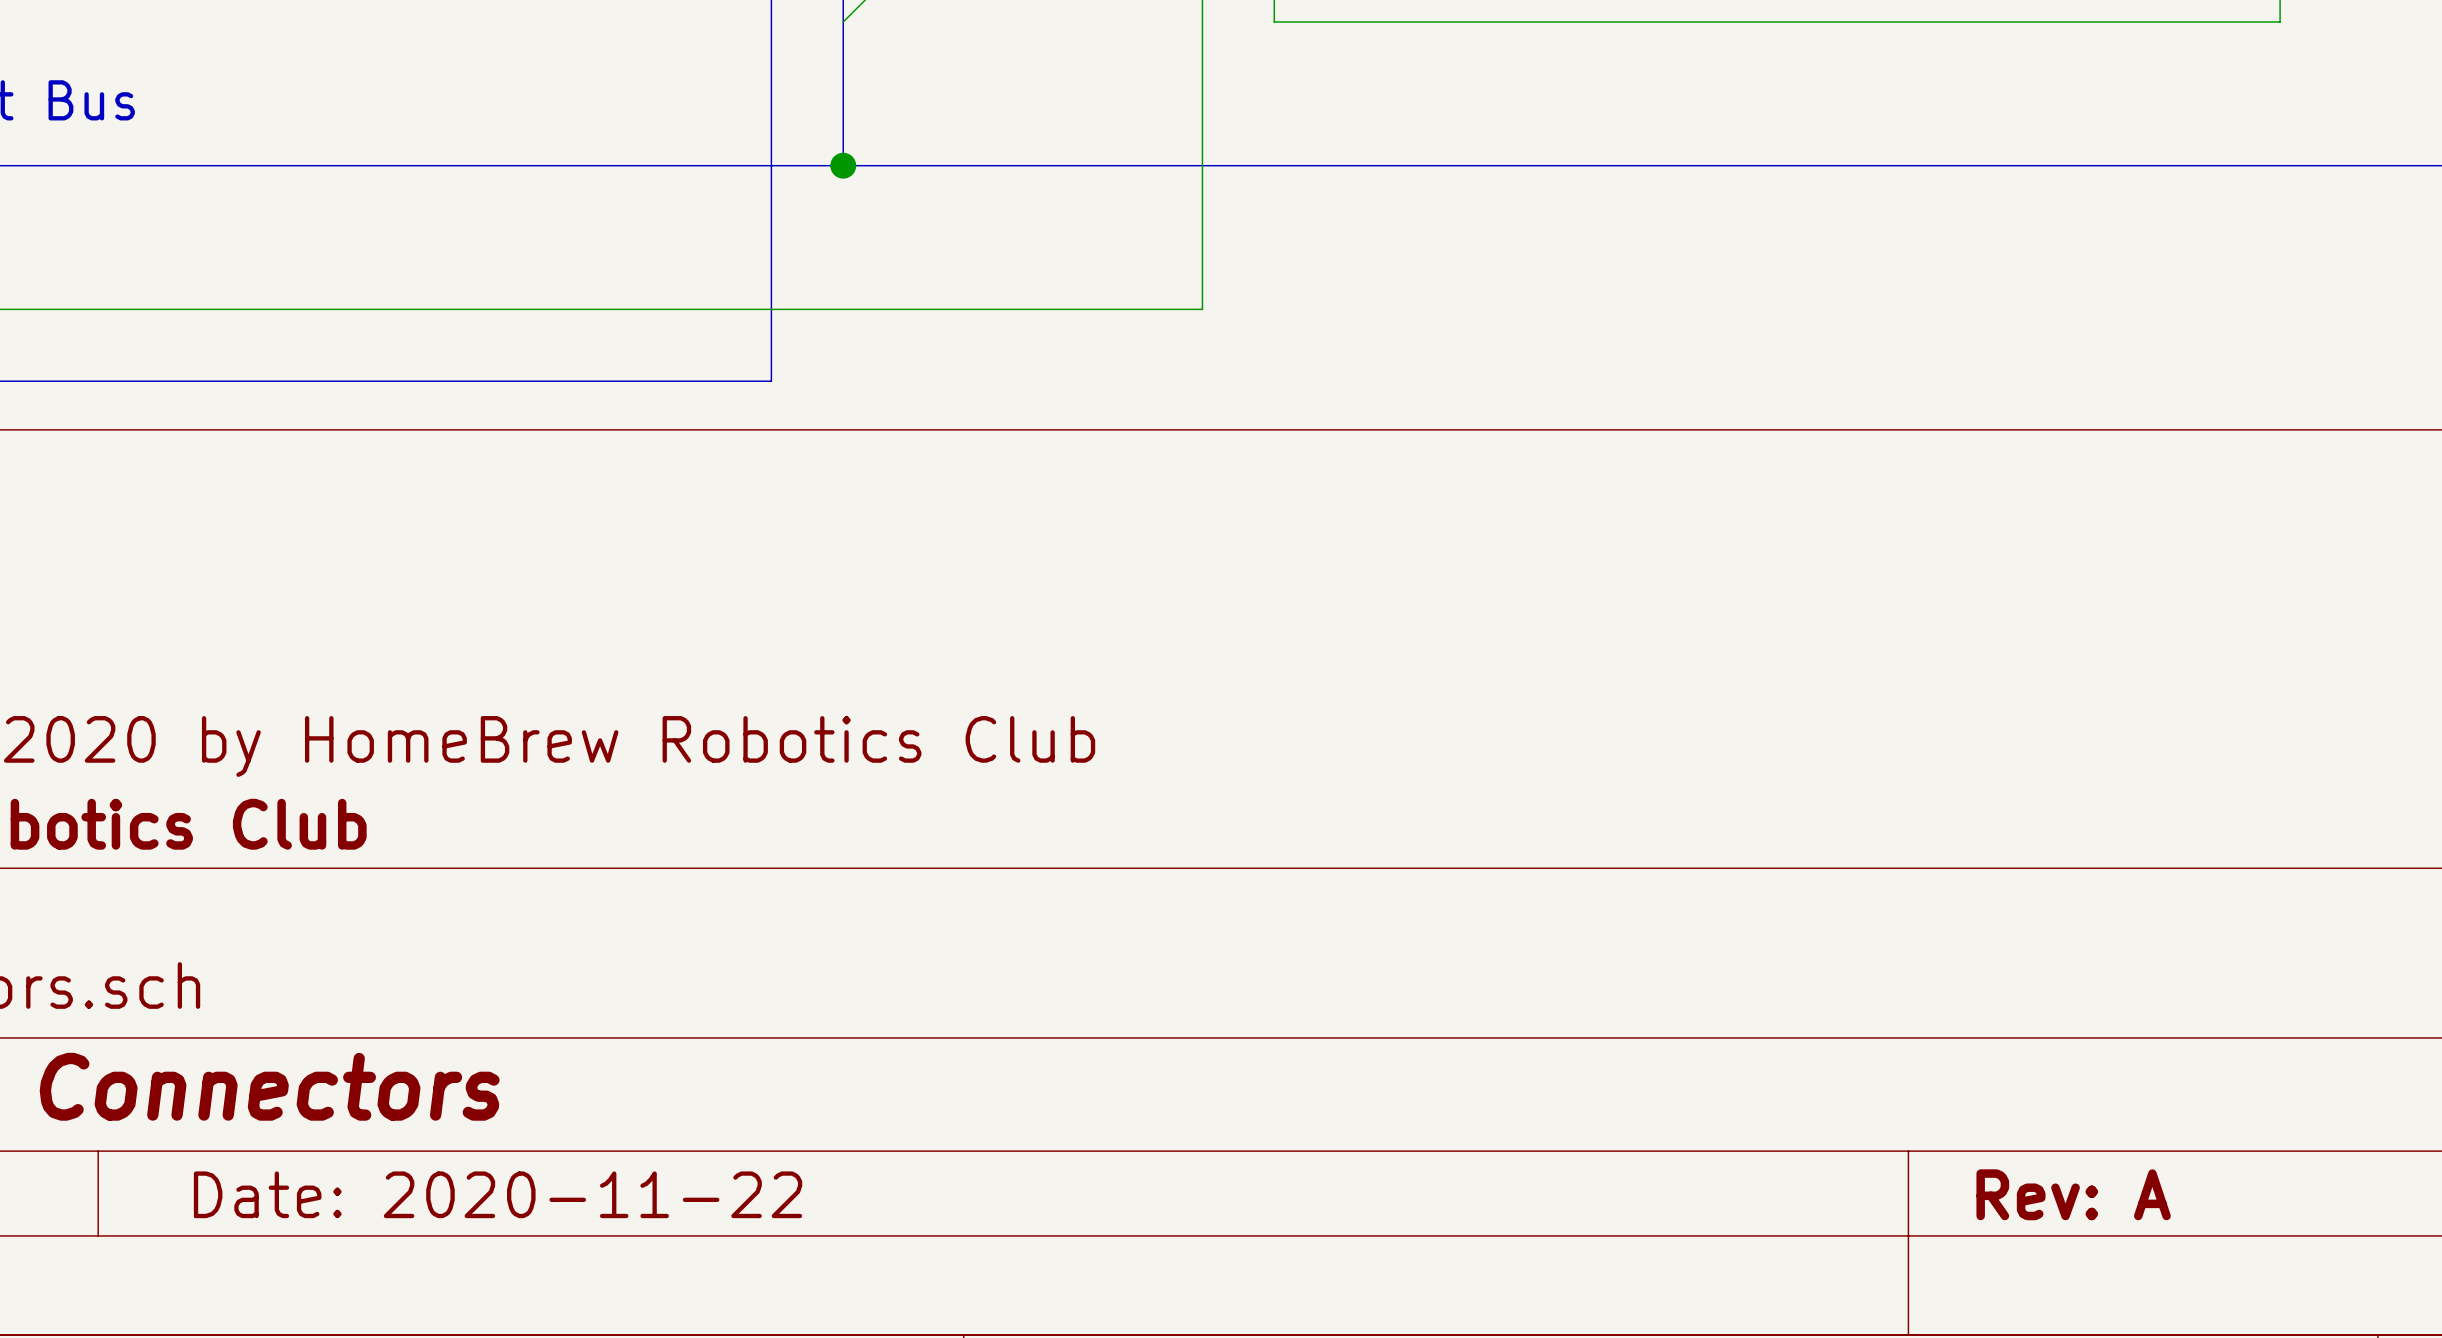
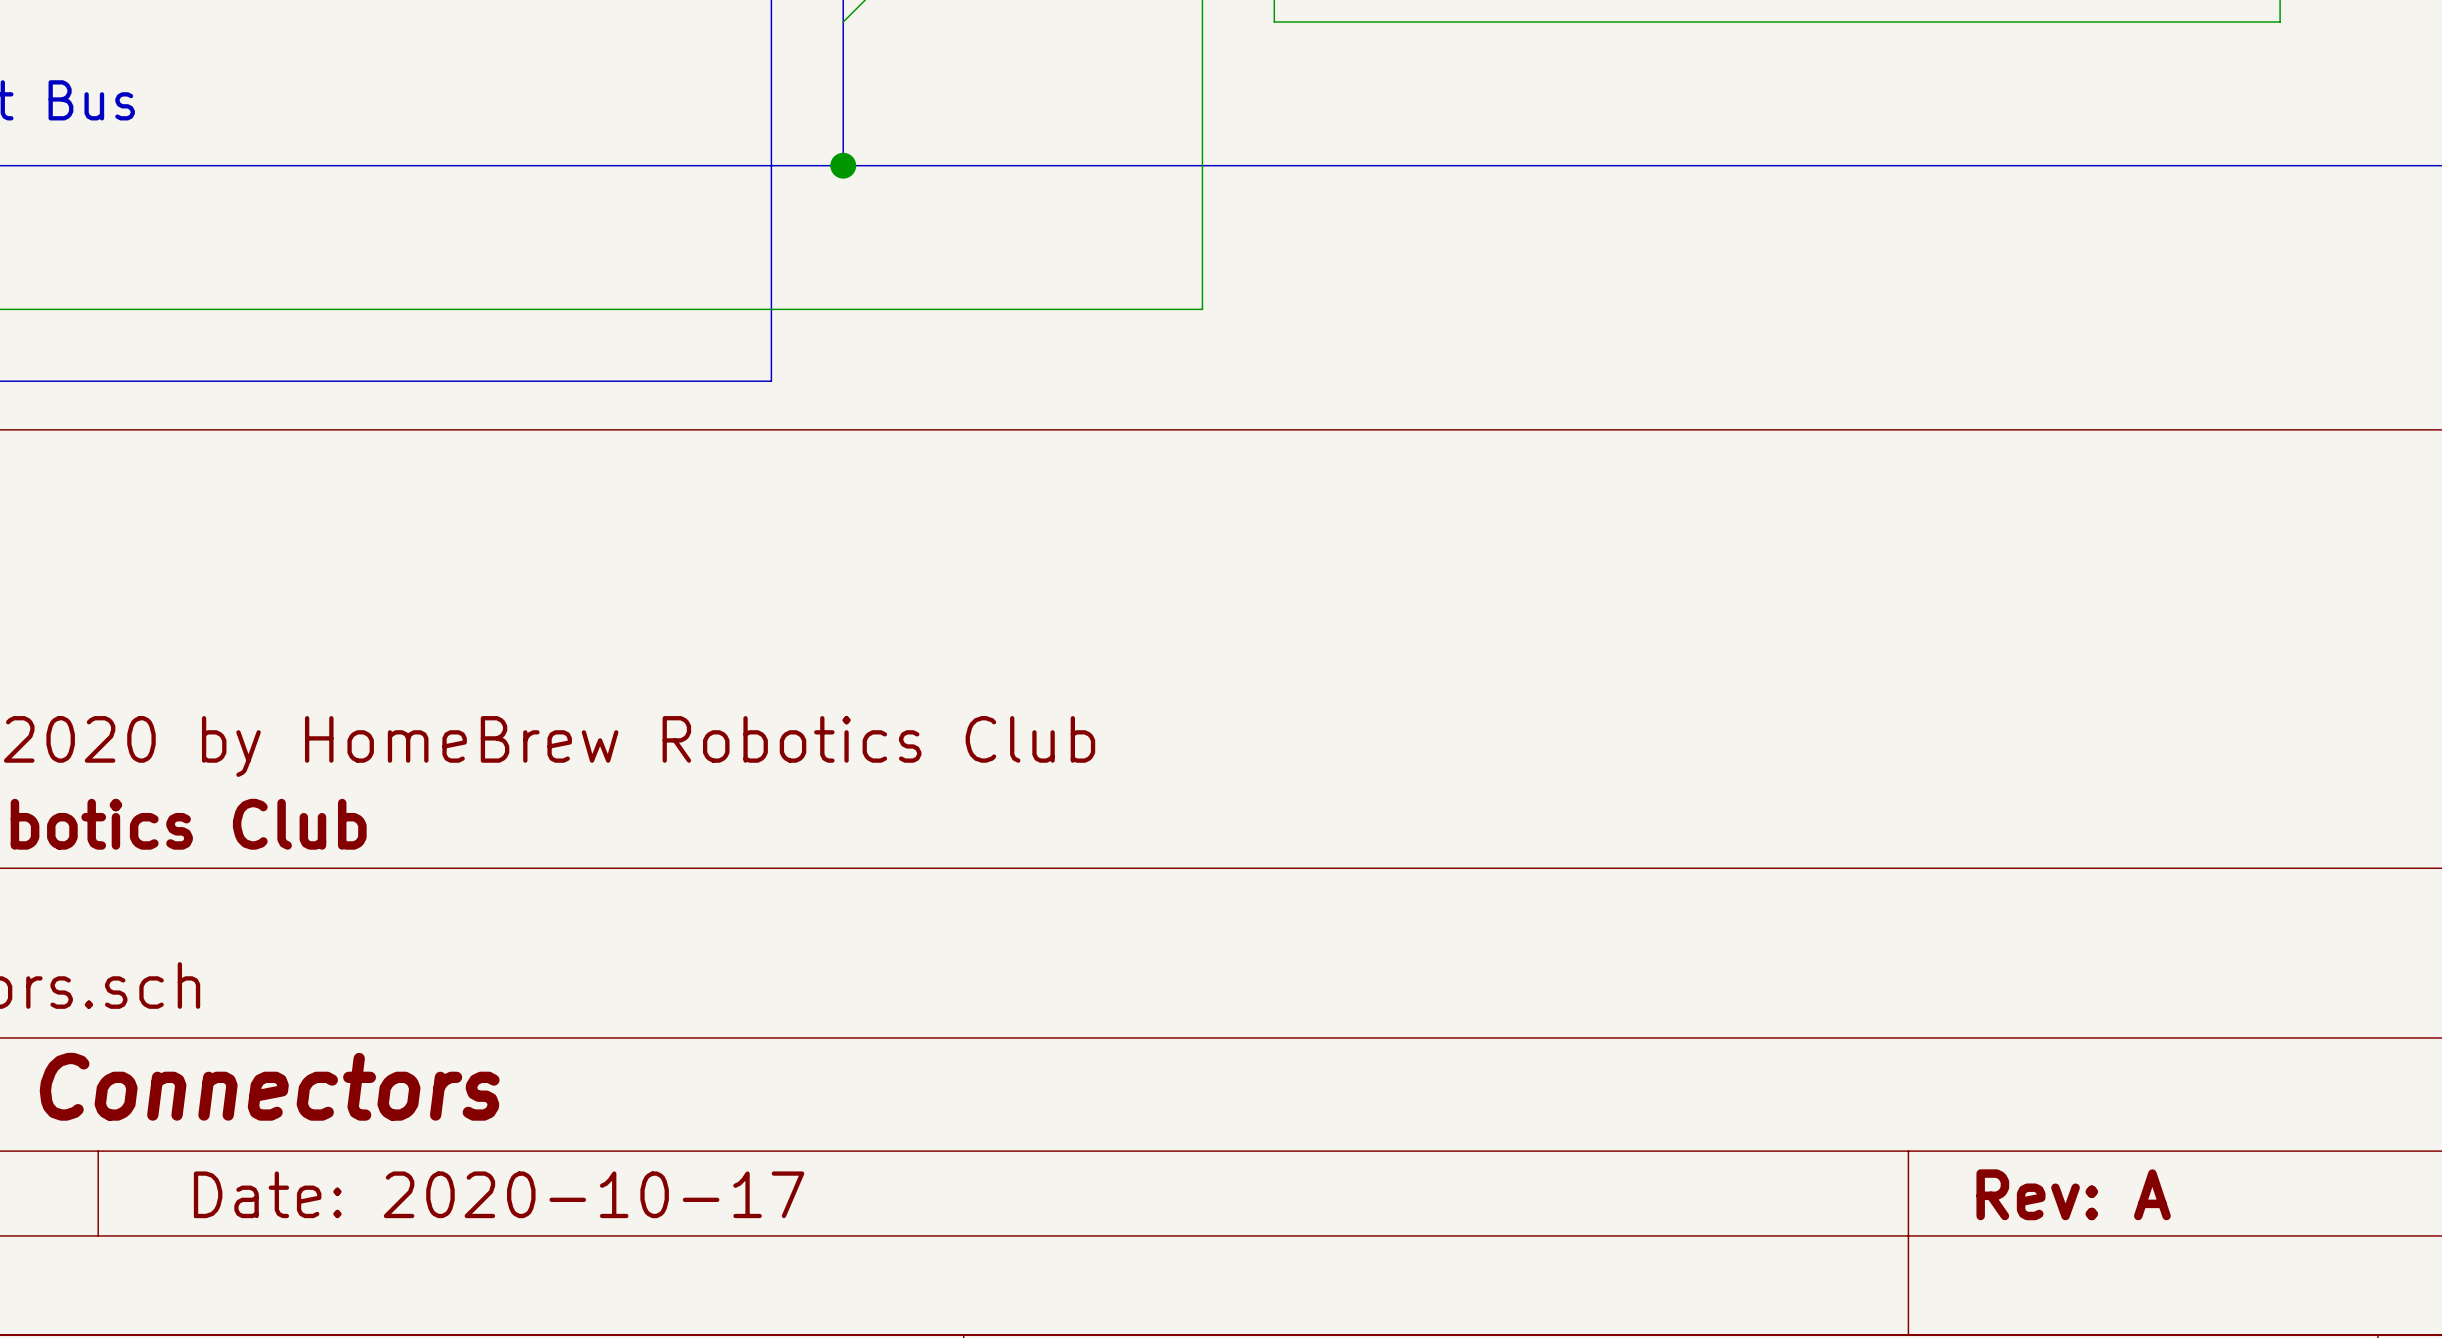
title block: Date: 2020-11-22 (498, 1194) -> Date: 2020-10-17 (499, 1194)

